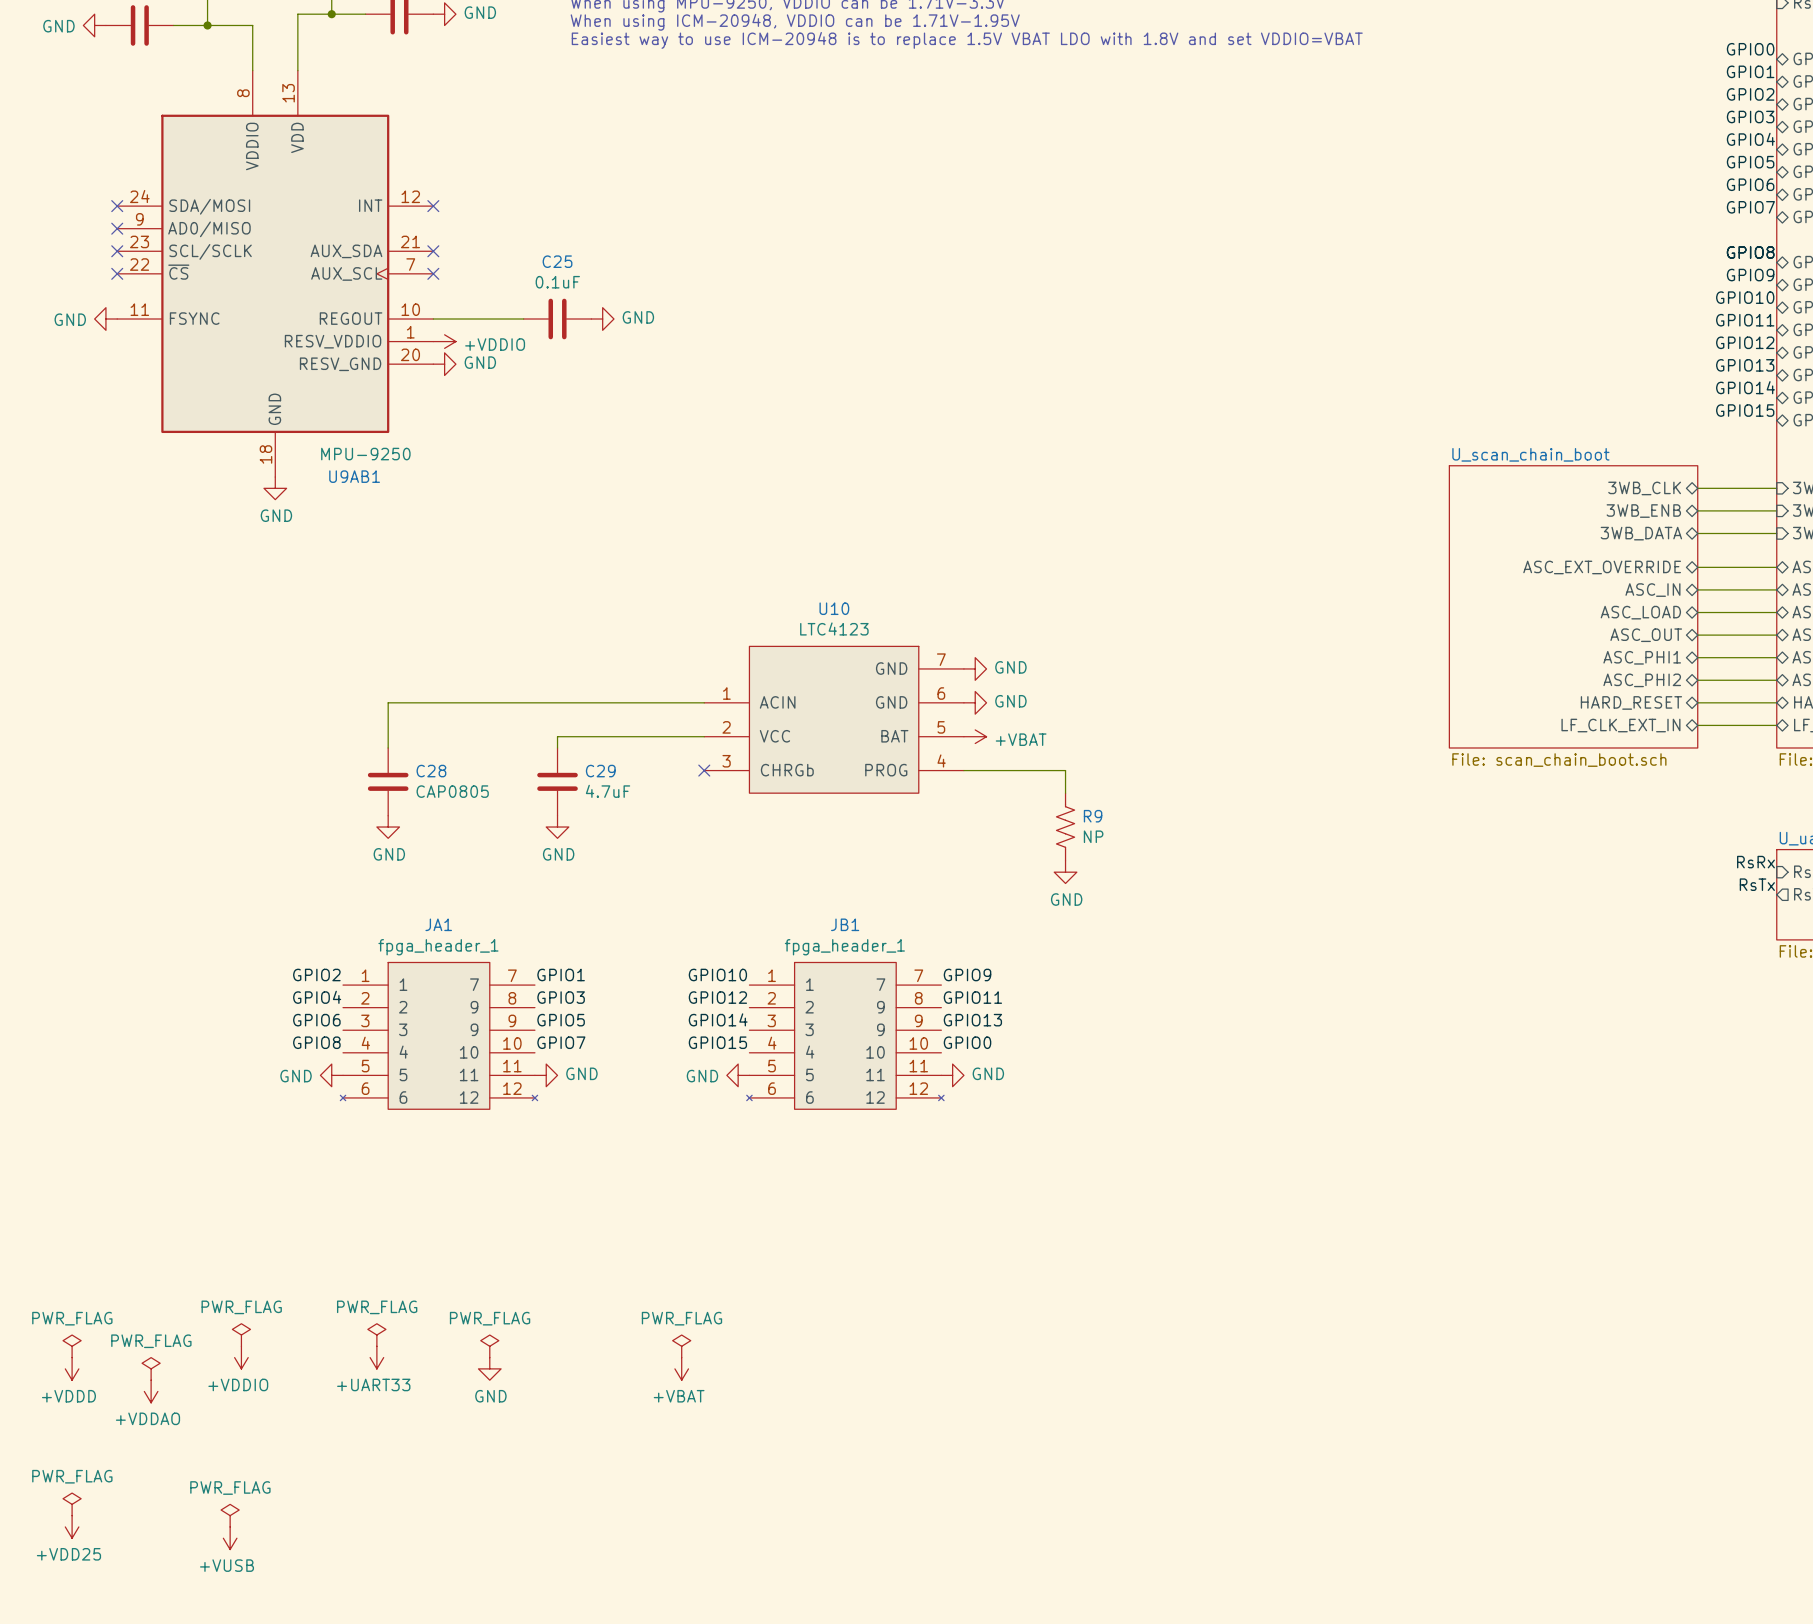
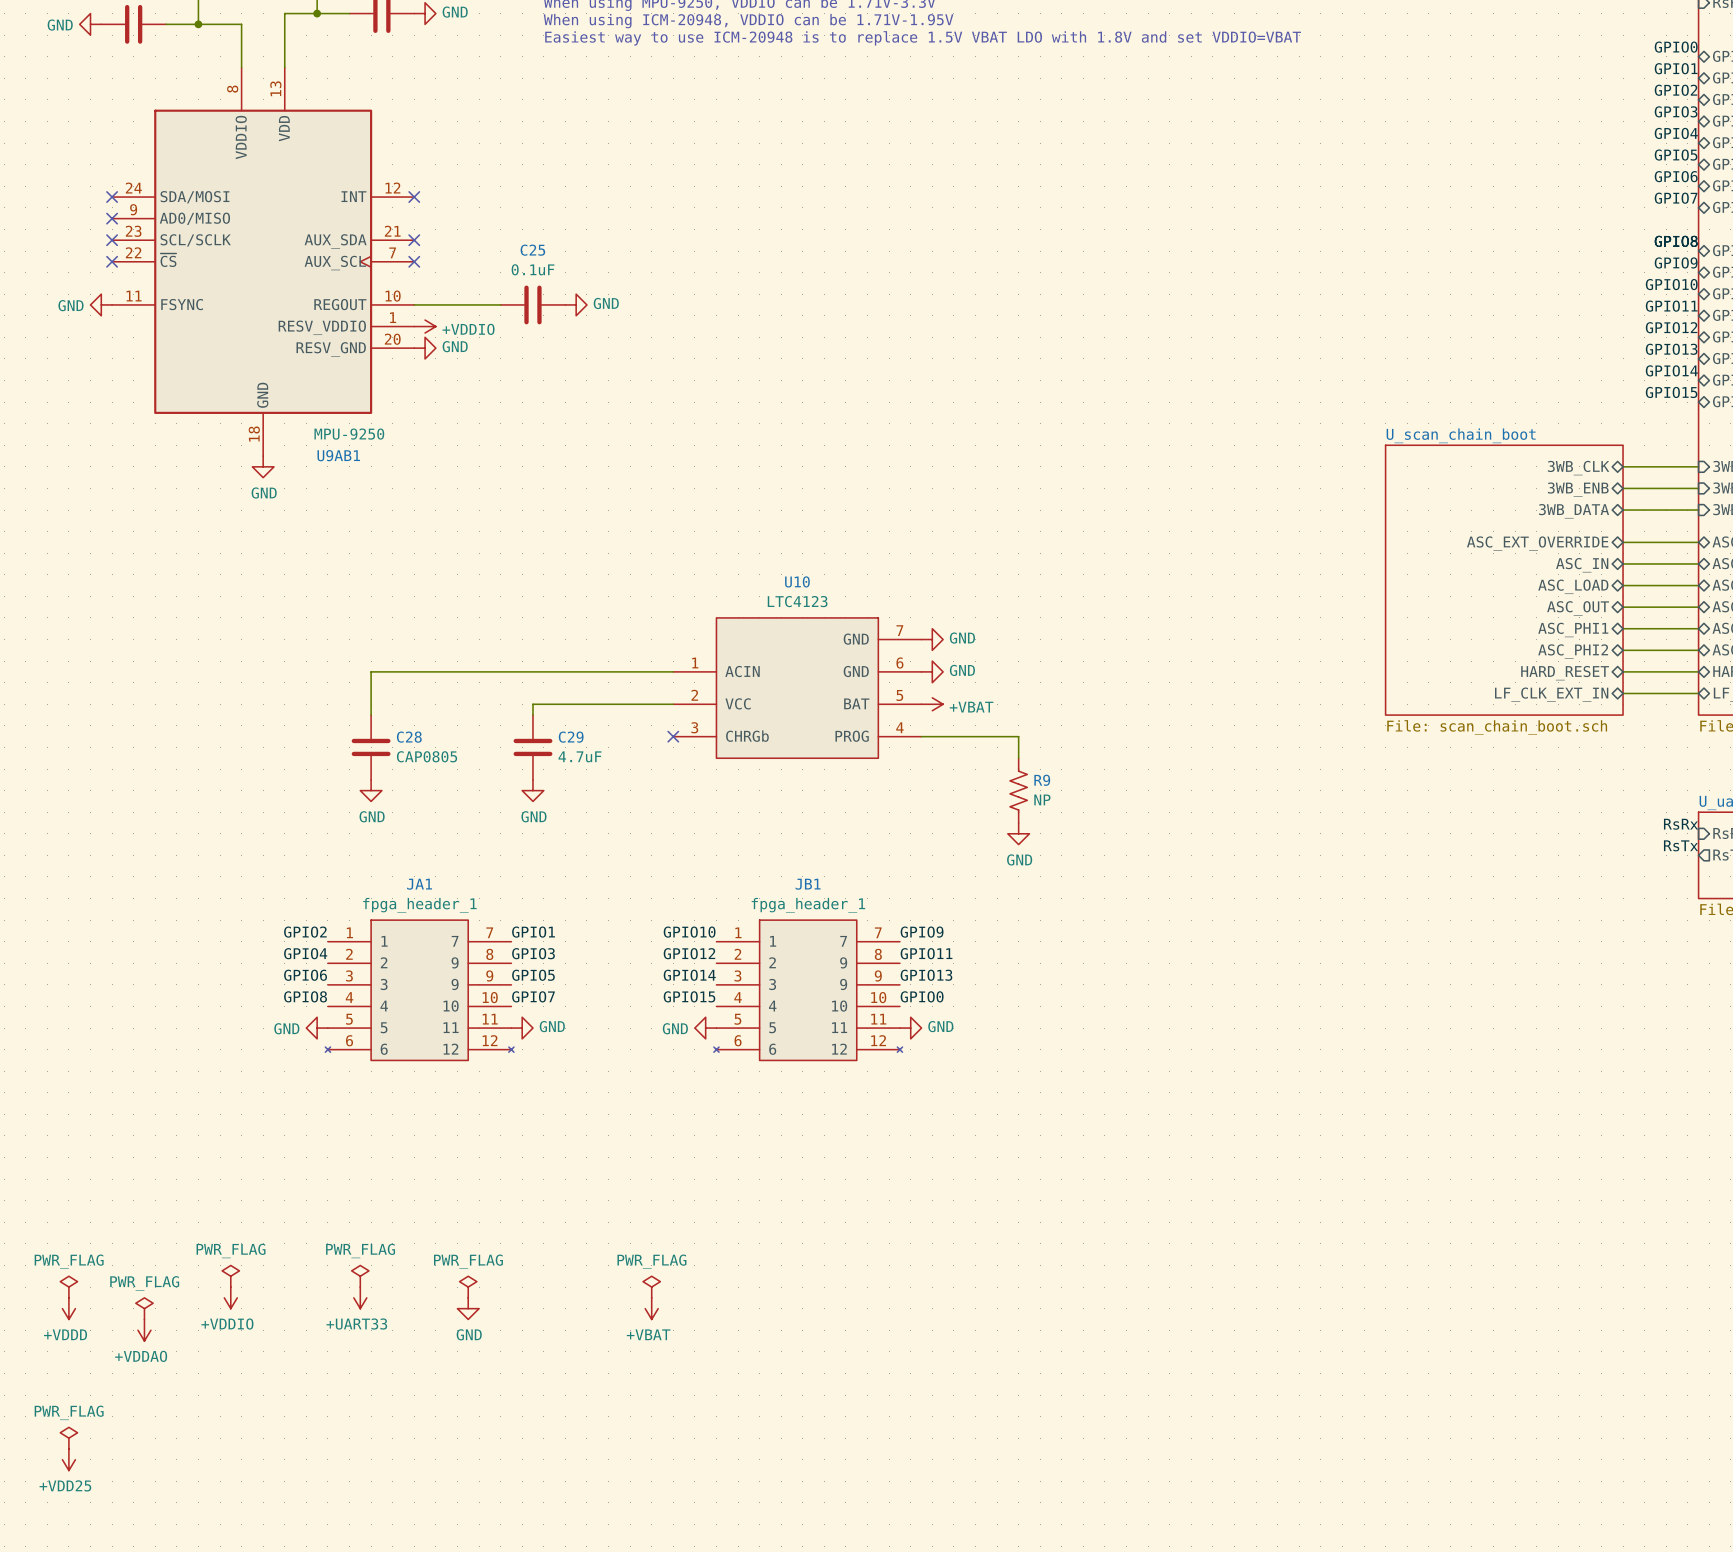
power symbol: PWR_FLAG (230, 1515) -> none
power symbol: +VUSB (230, 1538) -> none

